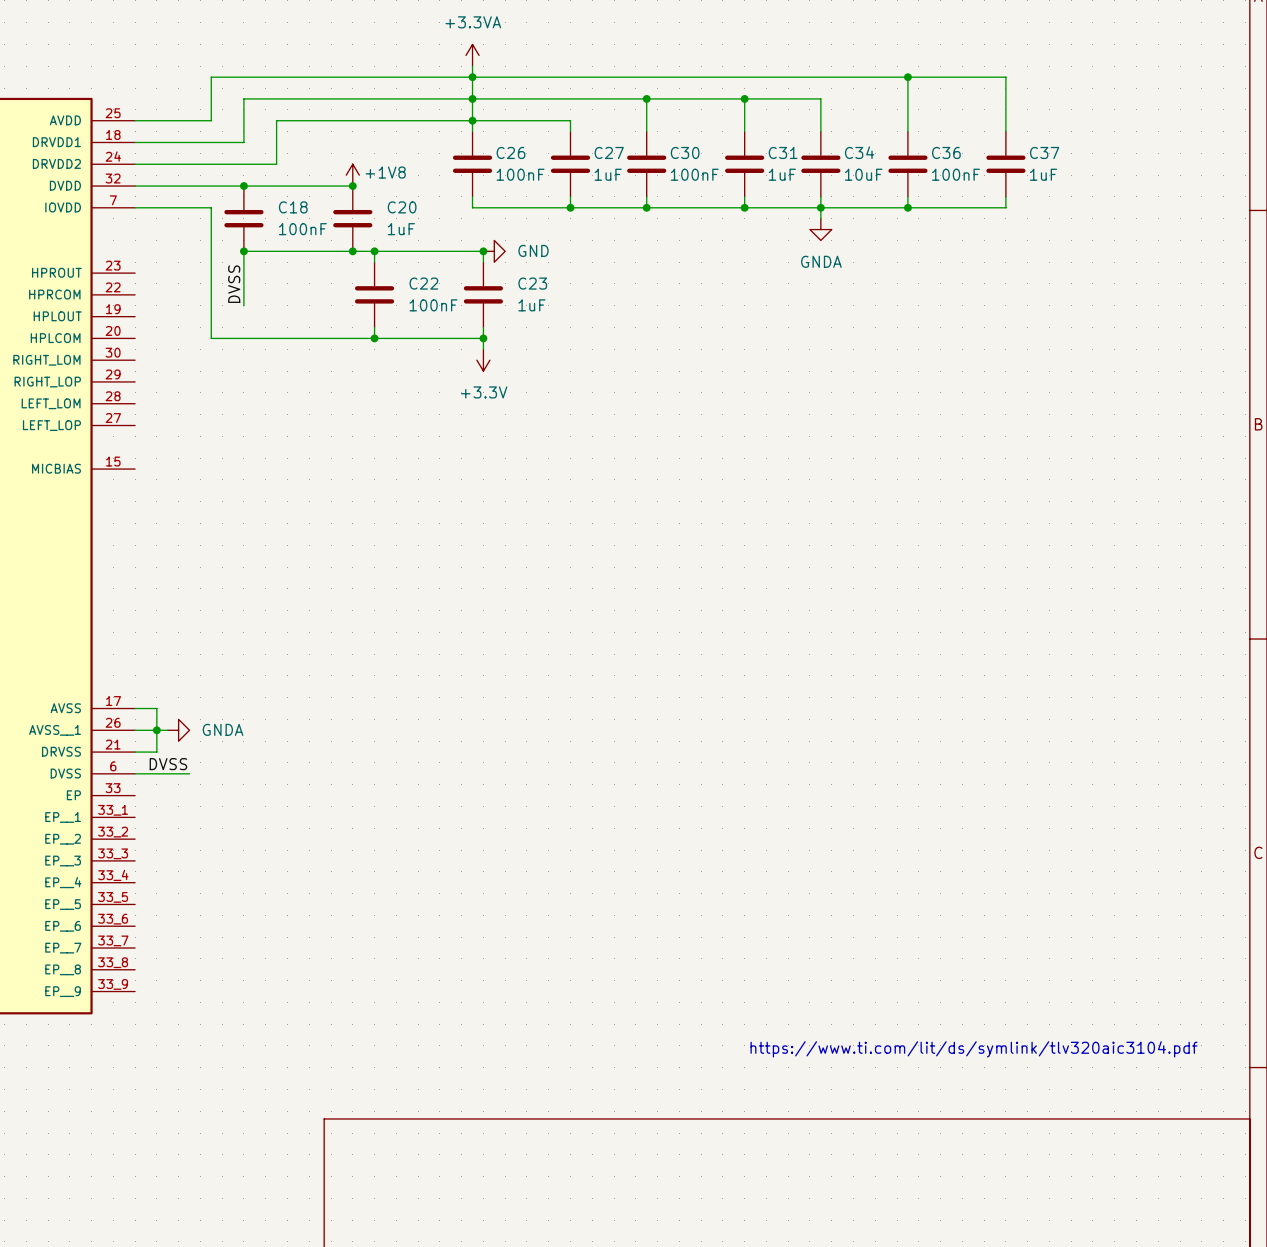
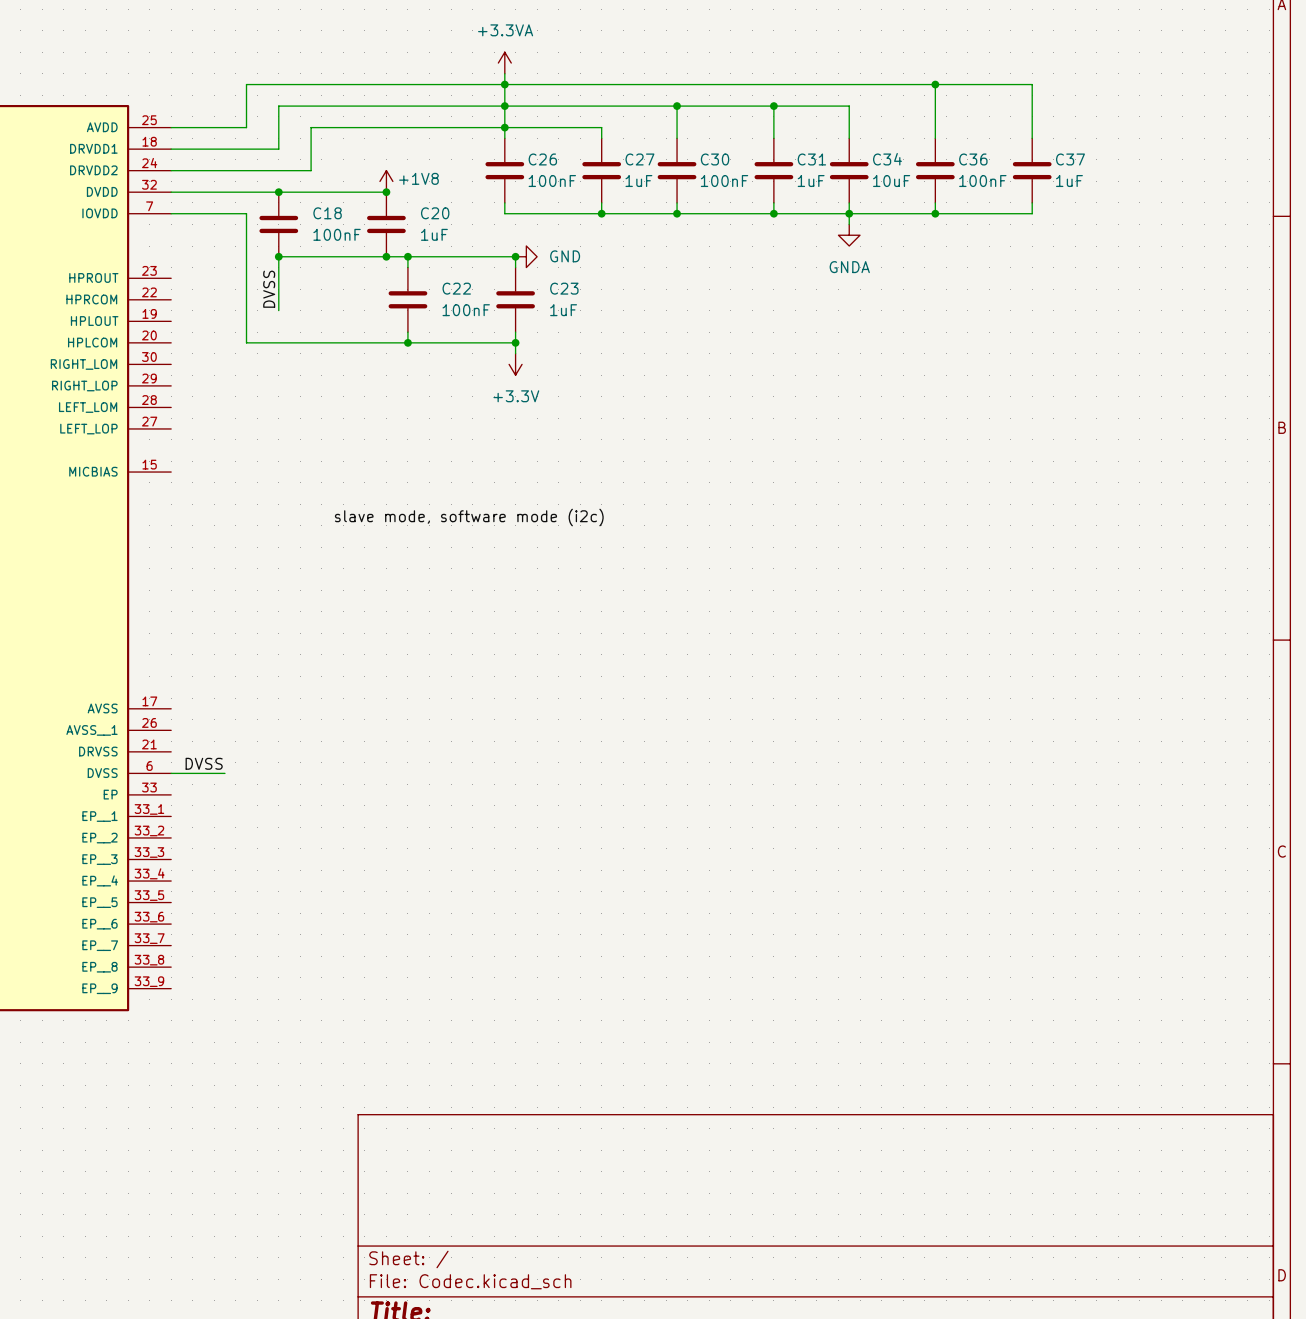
label: none -> slave mode, software mode (i2c) (469, 517)
wire: (135, 708) (156, 708) (156, 752) (135, 752) -> none
wire: (135, 730) (167, 730) -> none
junction: (156, 730) -> none
power symbol: GNDA (178, 730) -> none
text: https://www.ti.com/lit/ds/symlink/tlv320aic3104.pdf (974, 1049) -> none

